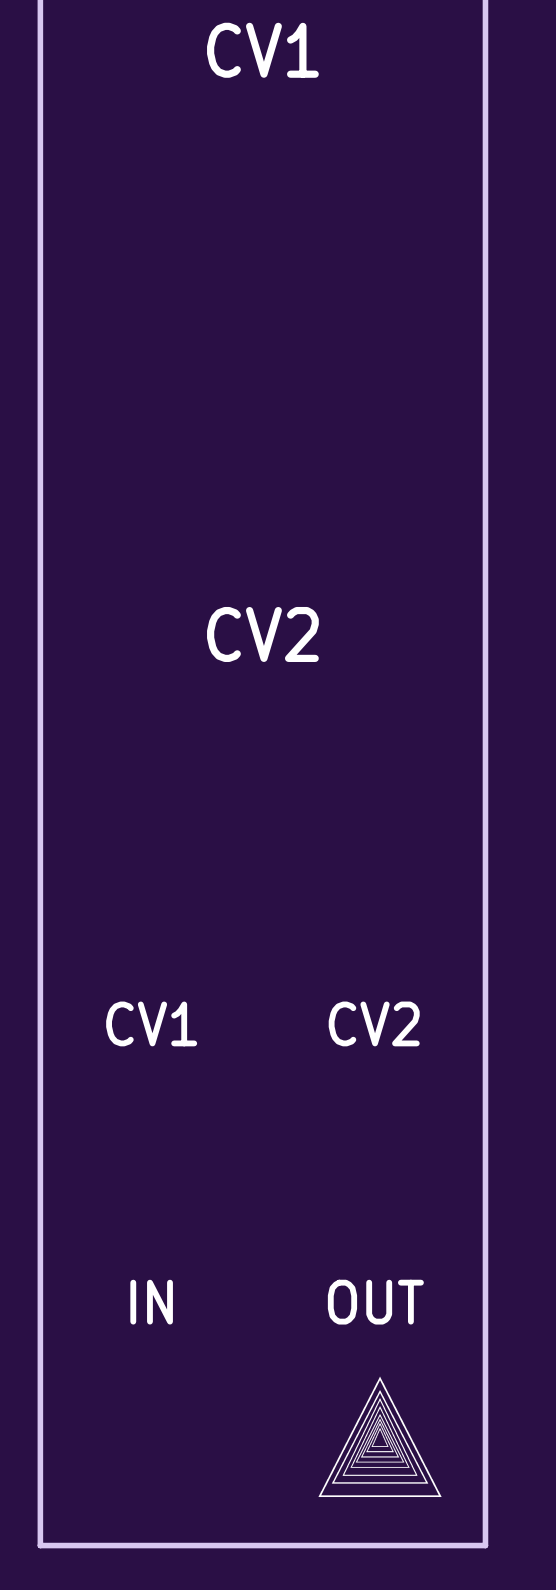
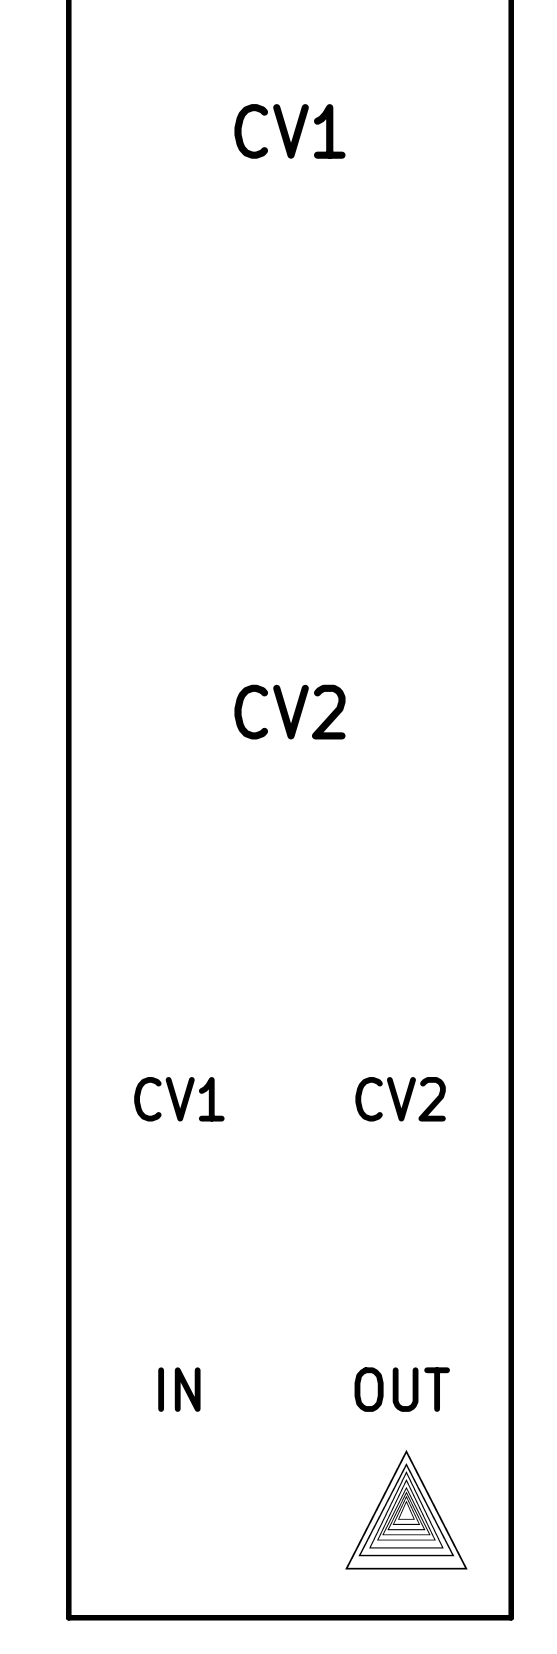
text position: IN (151, 1302) -> IN (179, 1389)
text position: OUT (375, 1302) -> OUT (402, 1389)

